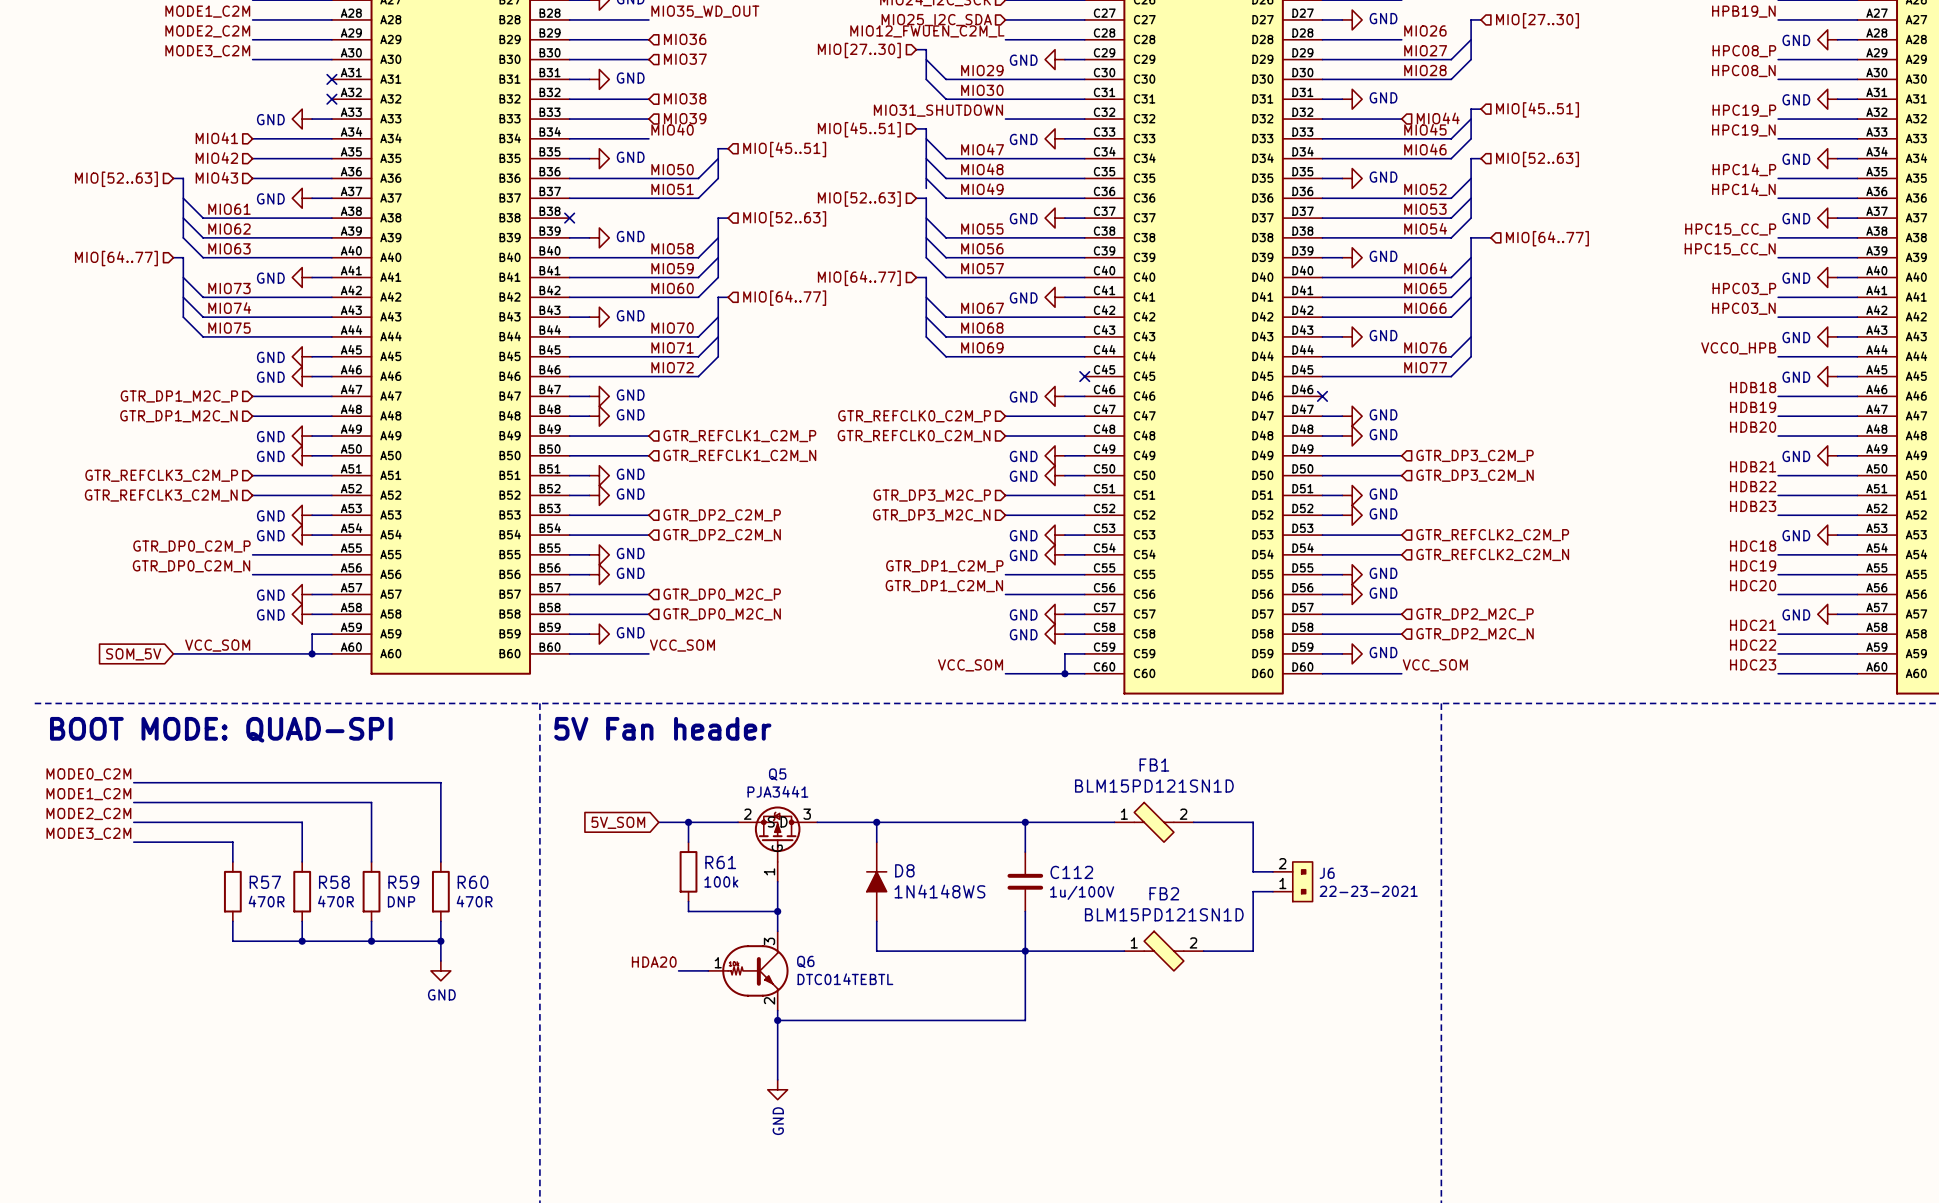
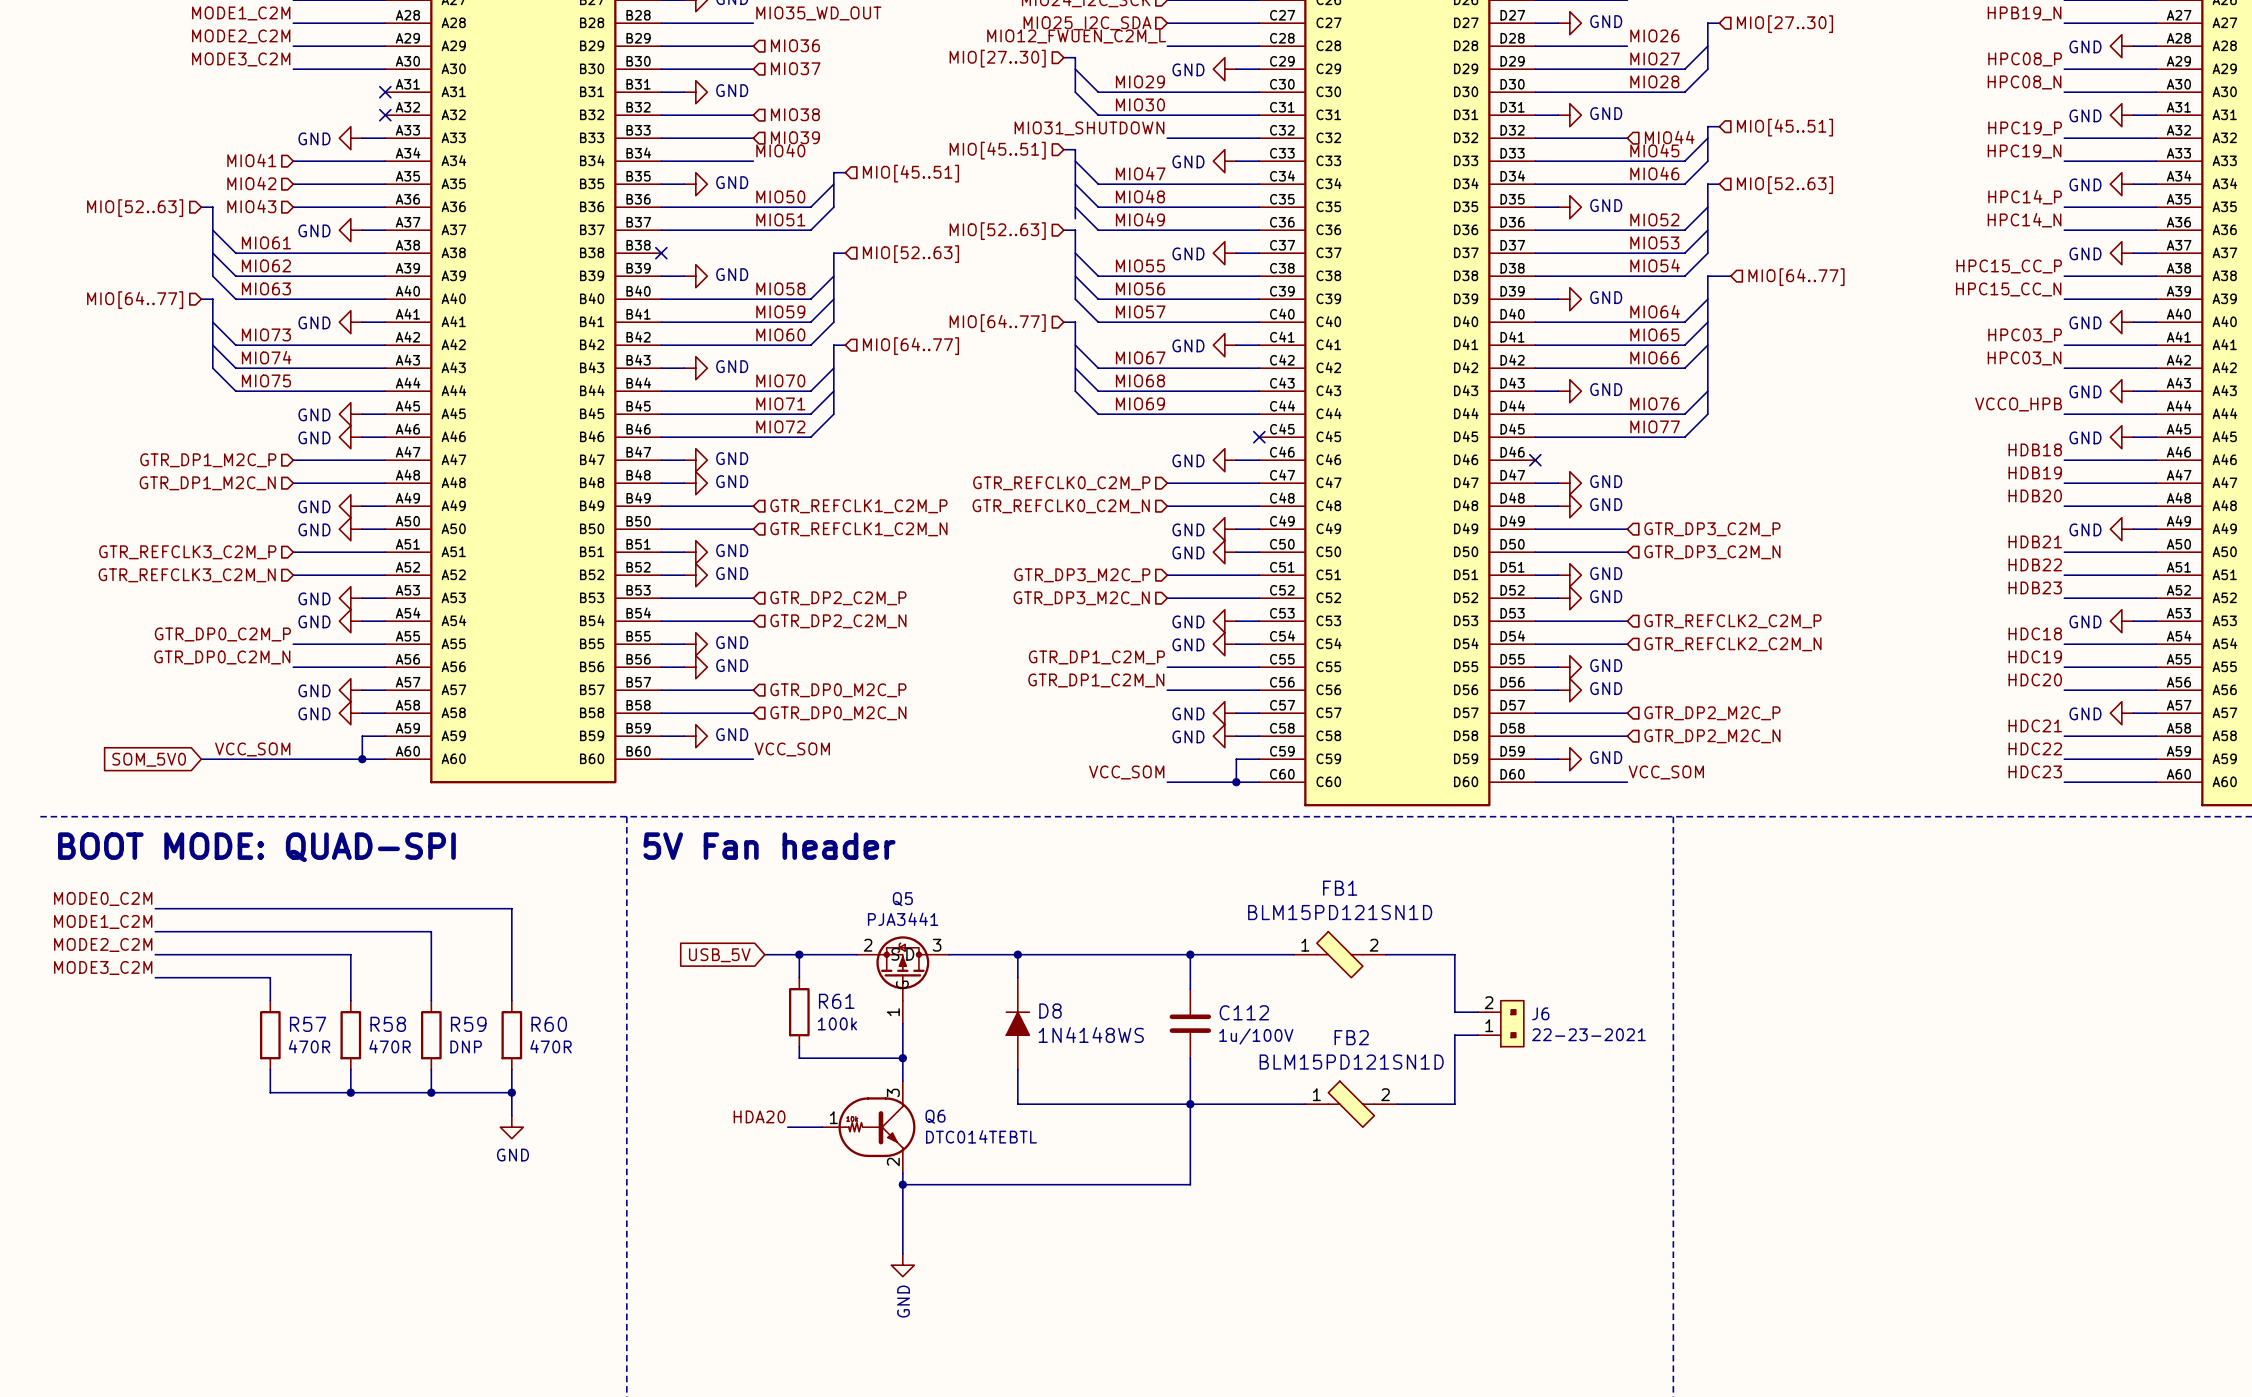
global label: SOM_5V (133, 654) -> SOM_5V0 (149, 759)
global label: 5V_SOM (618, 822) -> USB_5V (719, 955)

